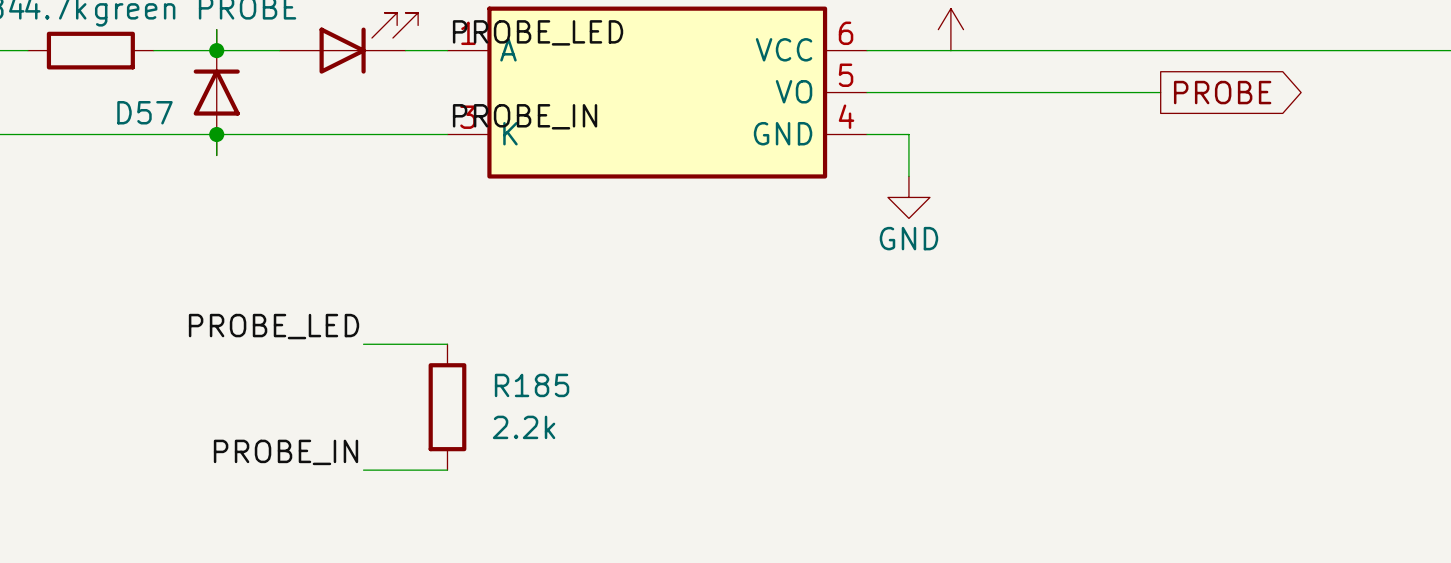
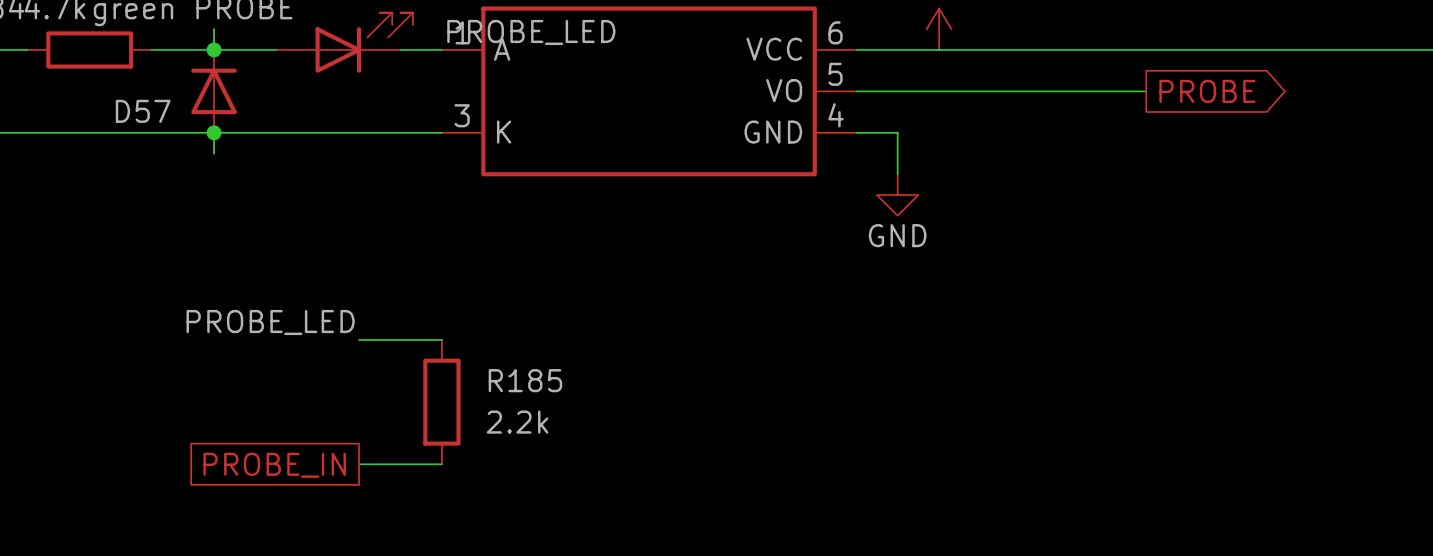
label: PROBE_IN (525, 116) -> none
label: PROBE_IN (286, 452) -> none
global label: none -> PROBE_IN (274, 465)

